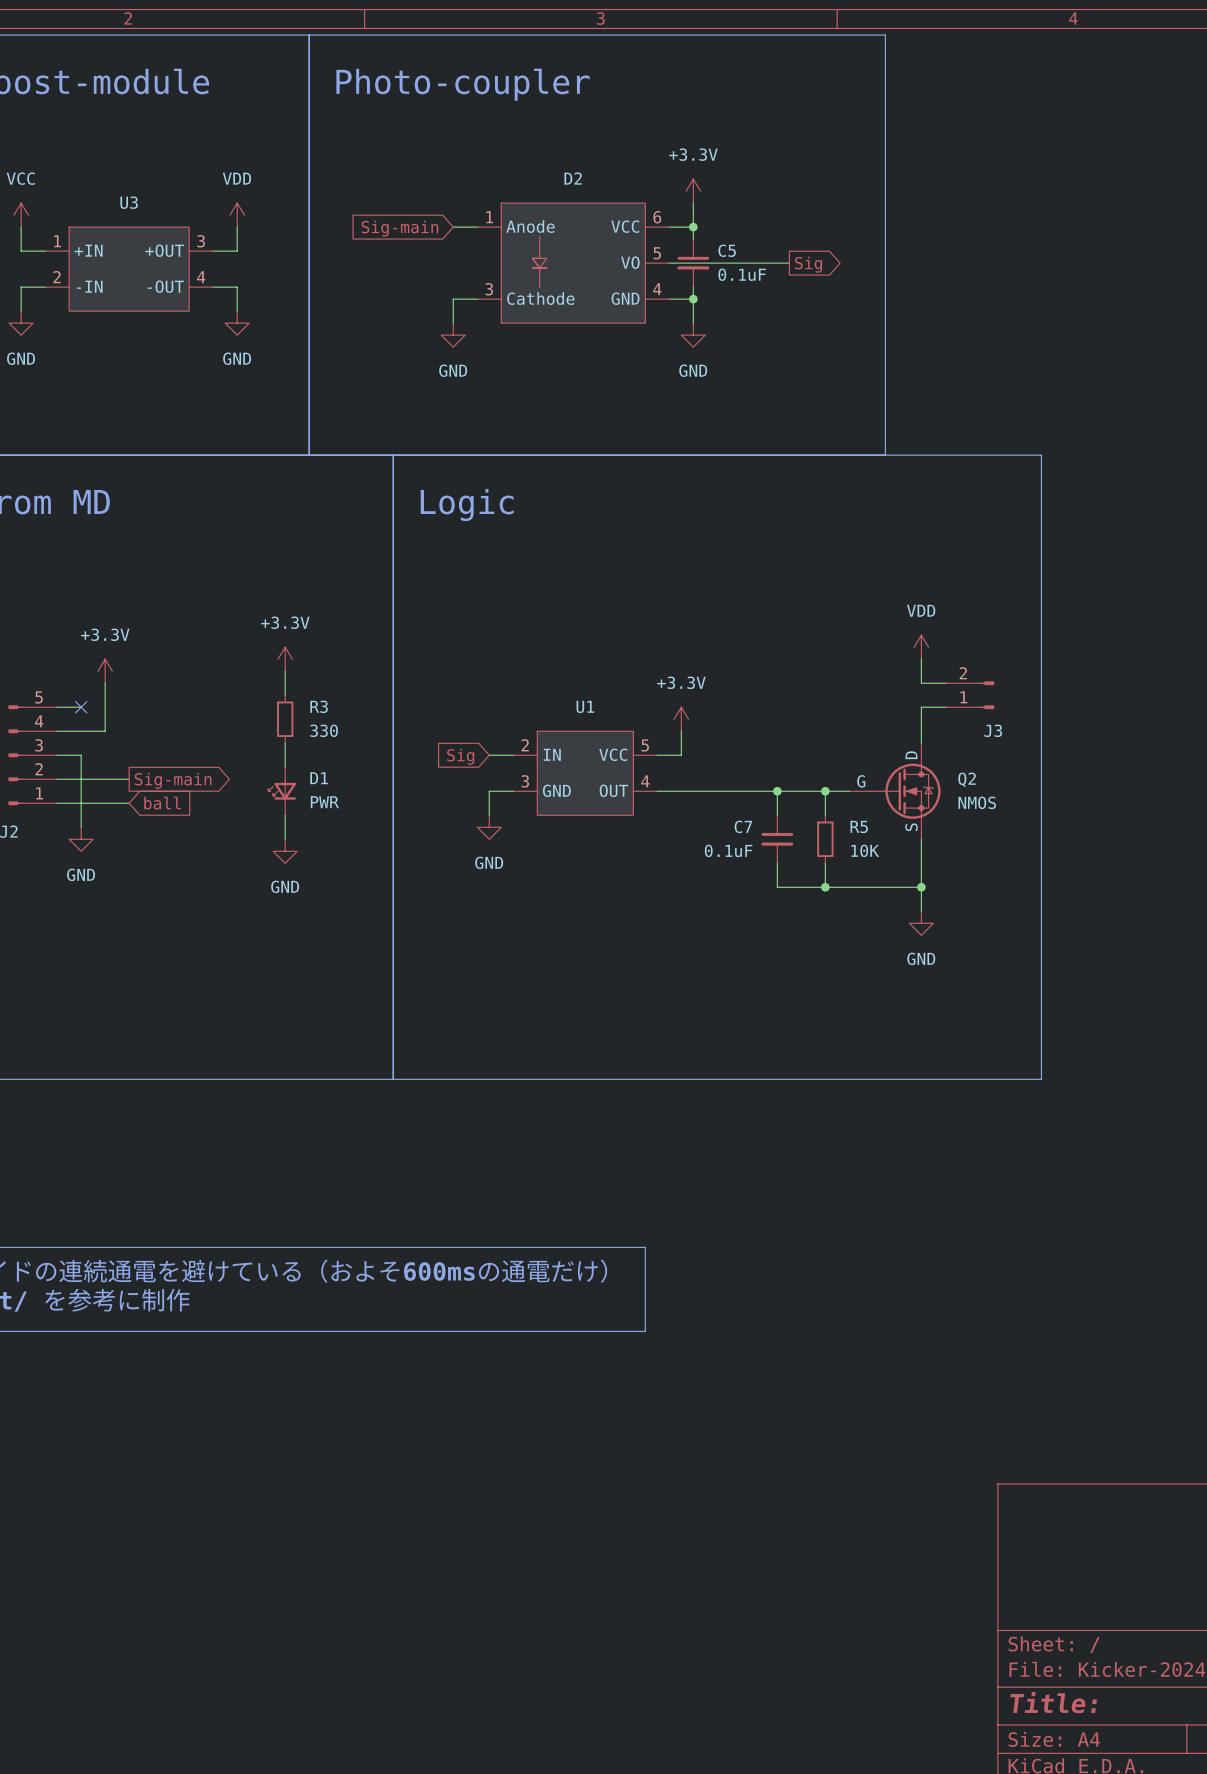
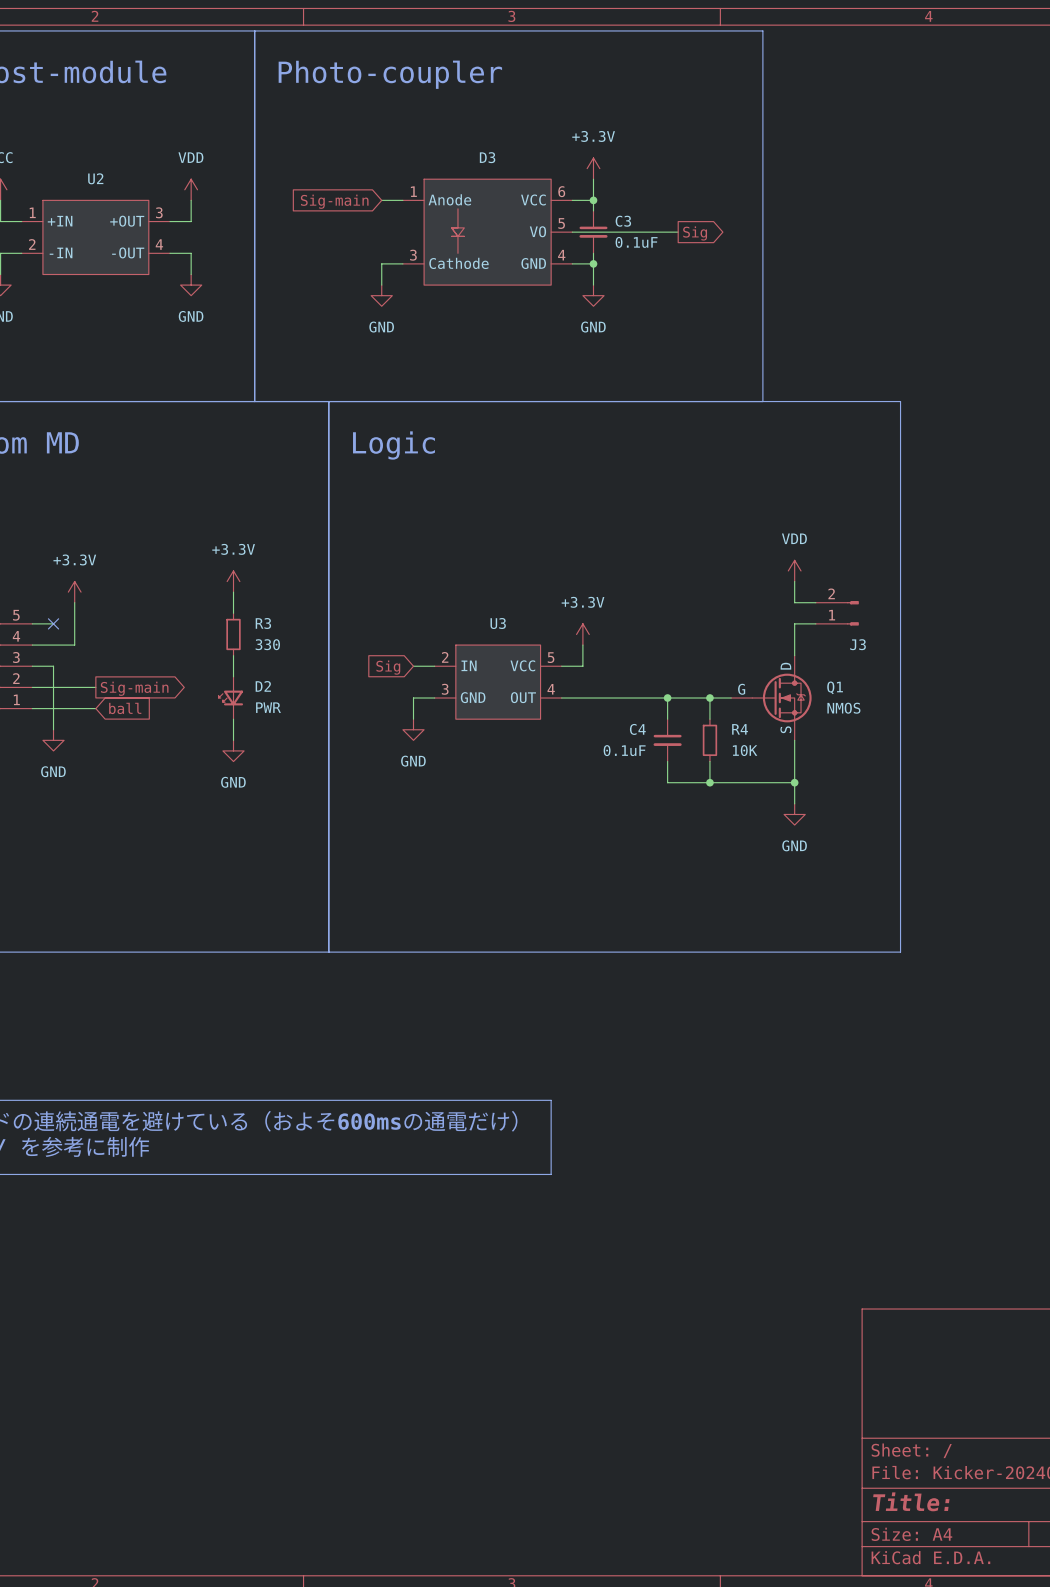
D2 name: D2 (573, 178) -> D3 (487, 157)
U3 name: U3 (129, 202) -> U2 (95, 178)
C5 name: C5 (727, 250) -> C3 (623, 221)
U1 name: U1 (585, 706) -> U3 (498, 623)
D1 name: D1 (319, 778) -> D2 (263, 686)
Q2 name: Q2 (967, 779) -> Q1 (835, 687)
C7 name: C7 (743, 826) -> C4 (637, 729)
R5 name: R5 (859, 826) -> R4 (740, 729)

